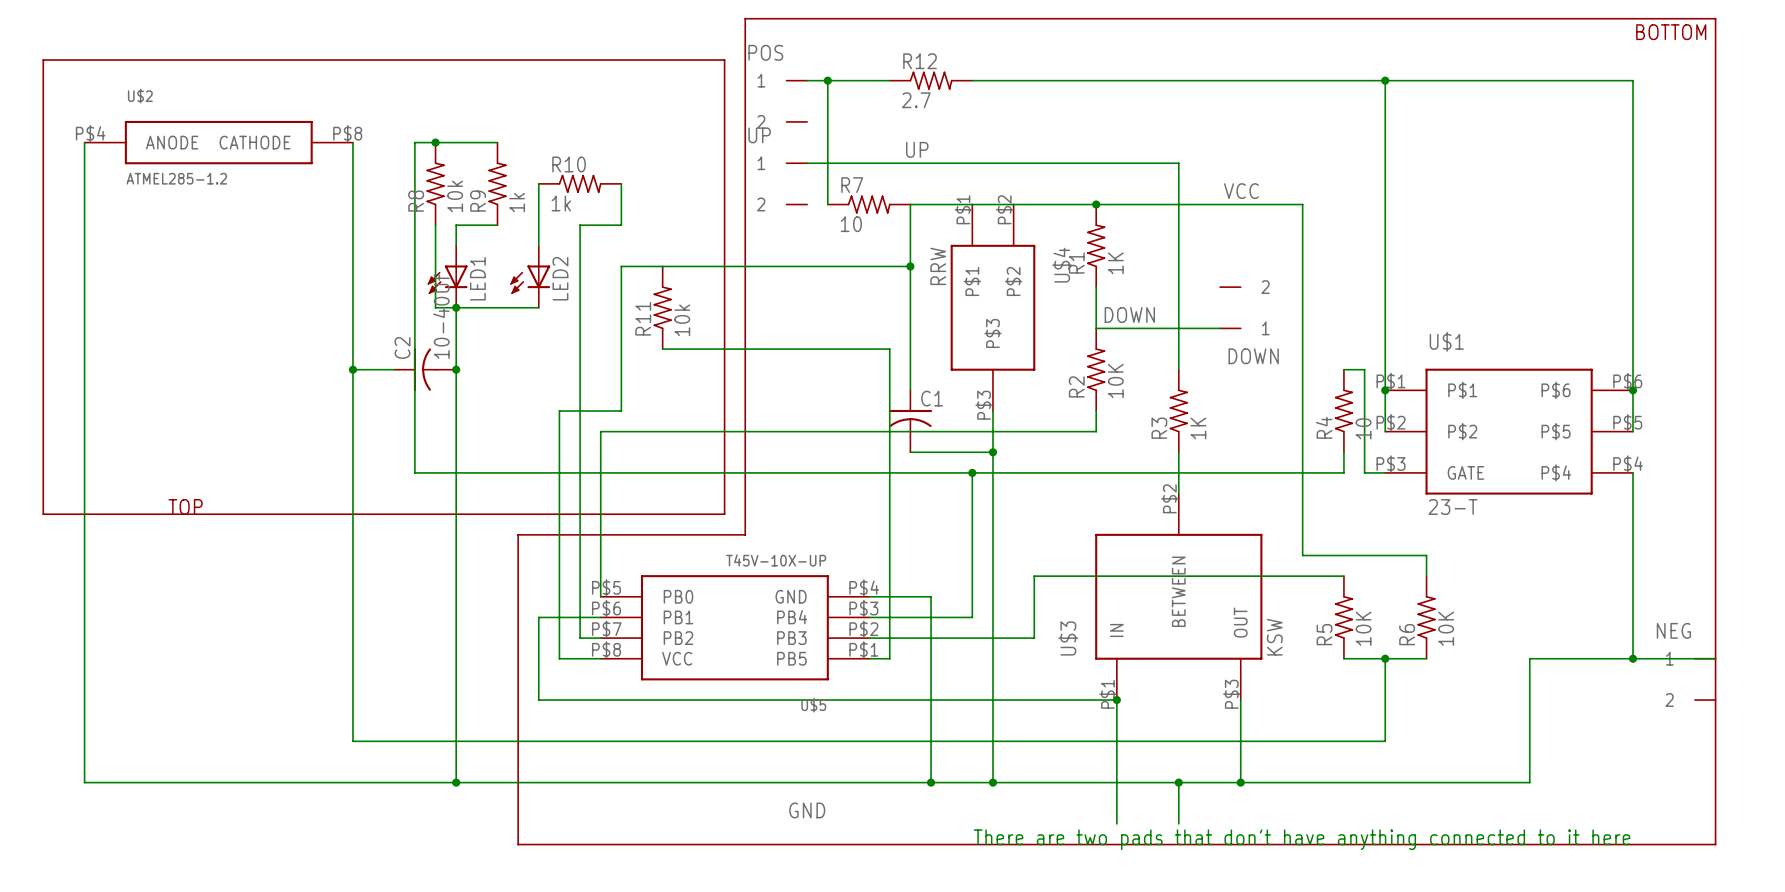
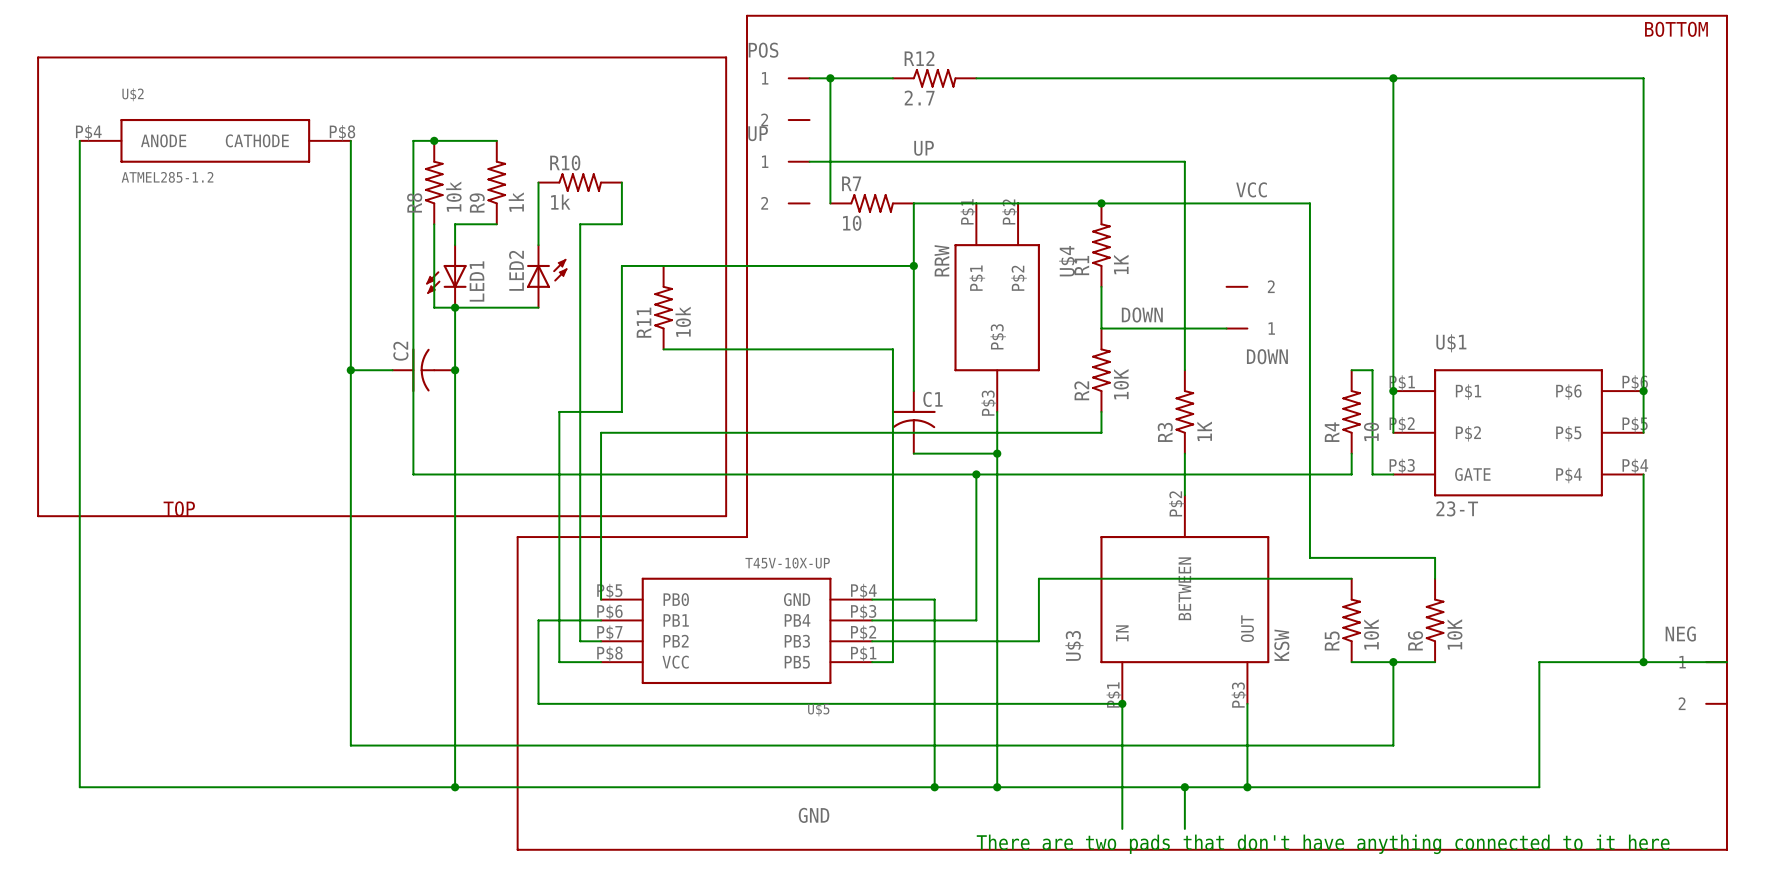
LED2 rotation: 0° (530, 279) -> 180° (547, 273)
C2 value: 10-40Uf (441, 316) -> none

